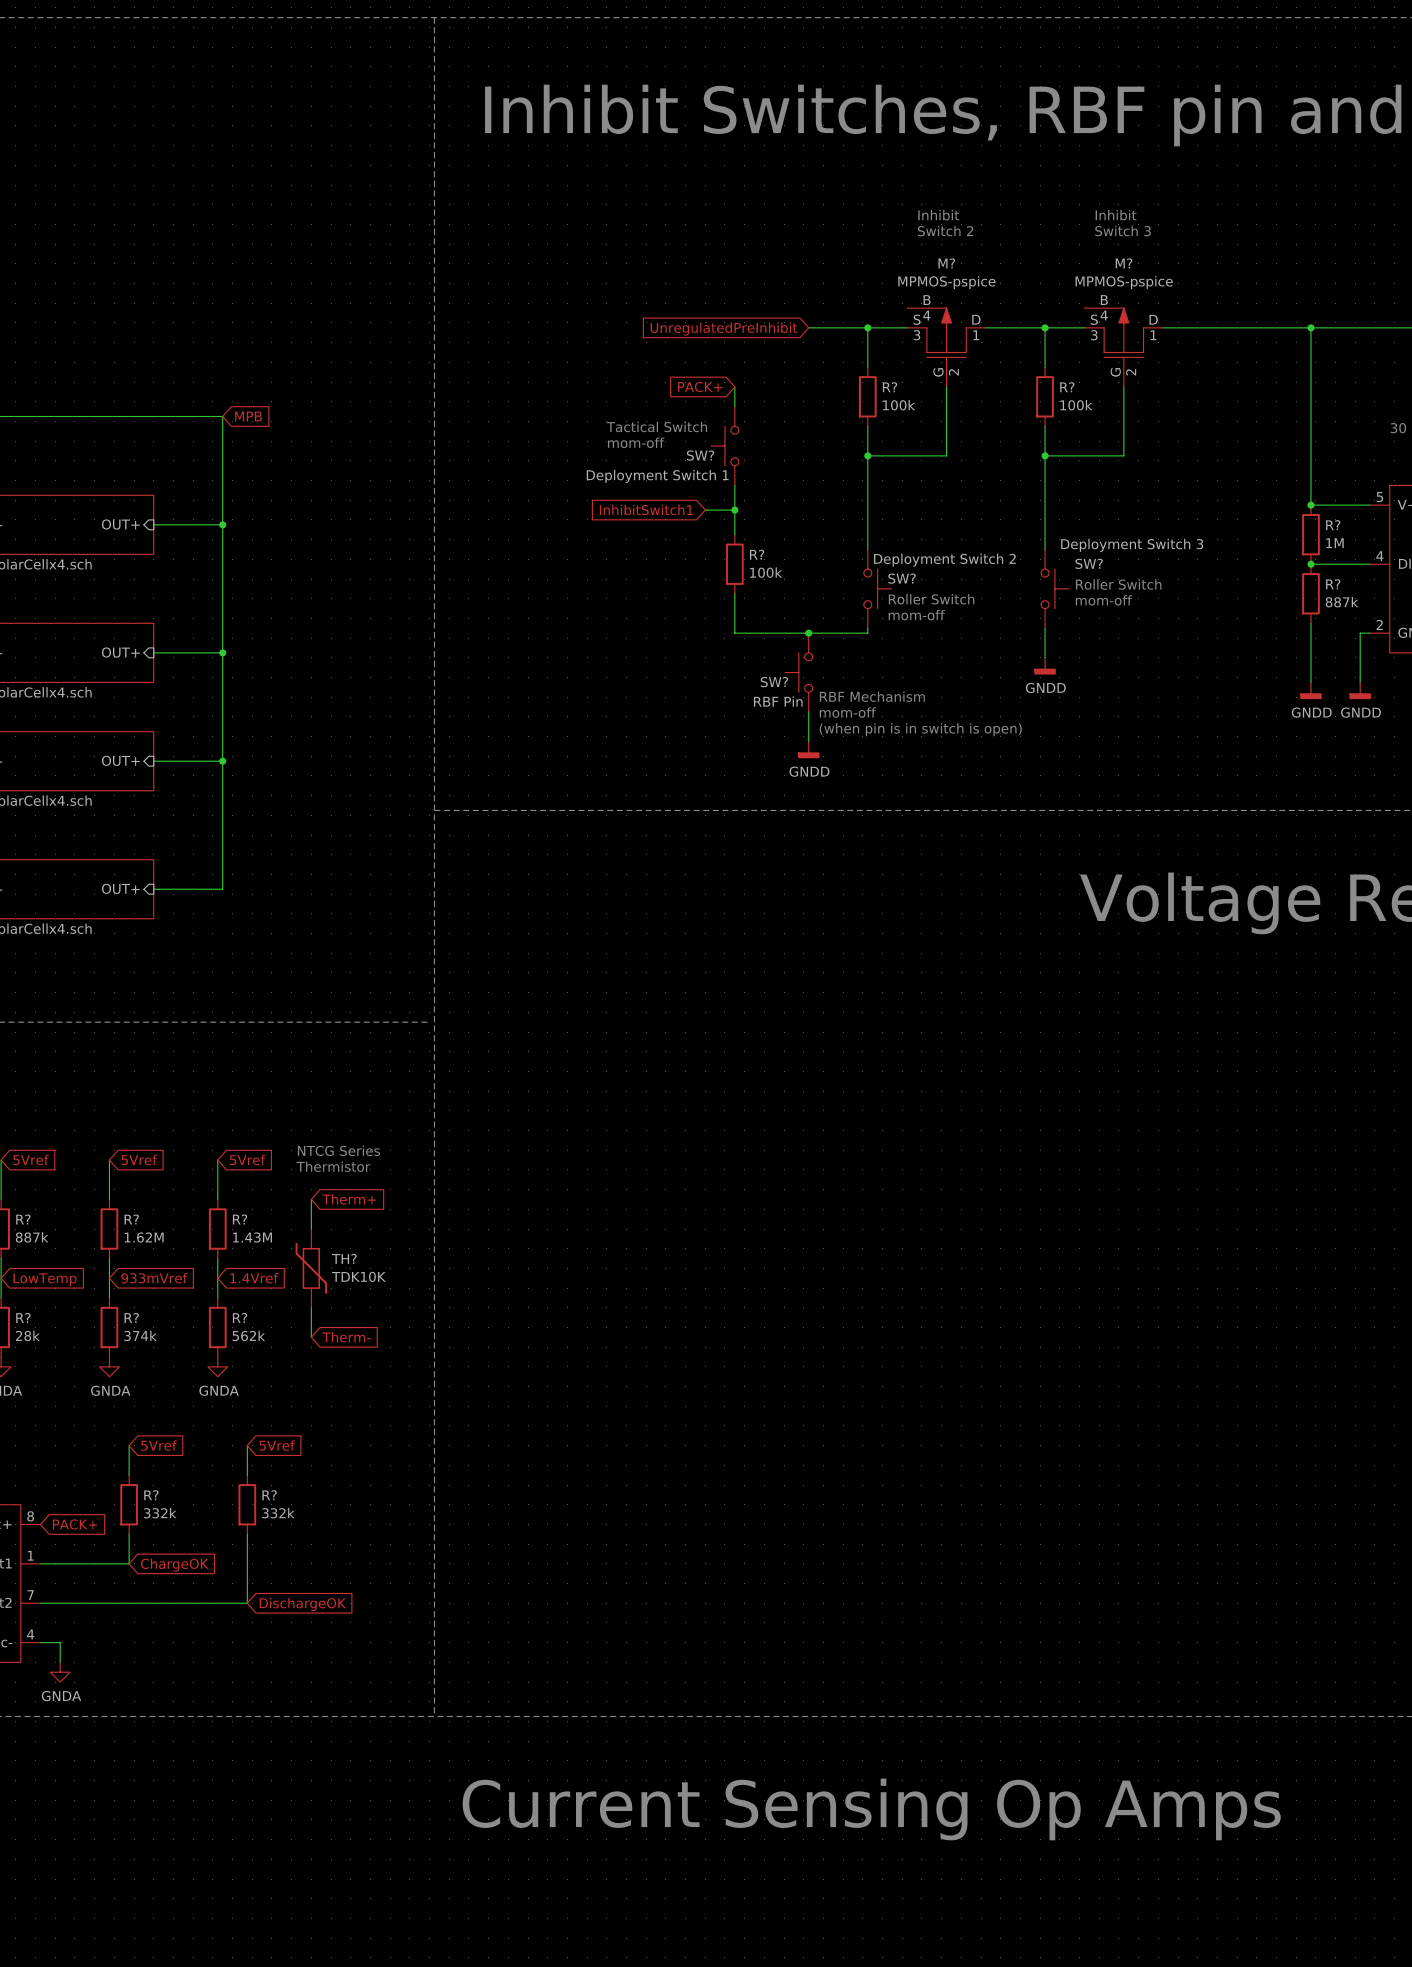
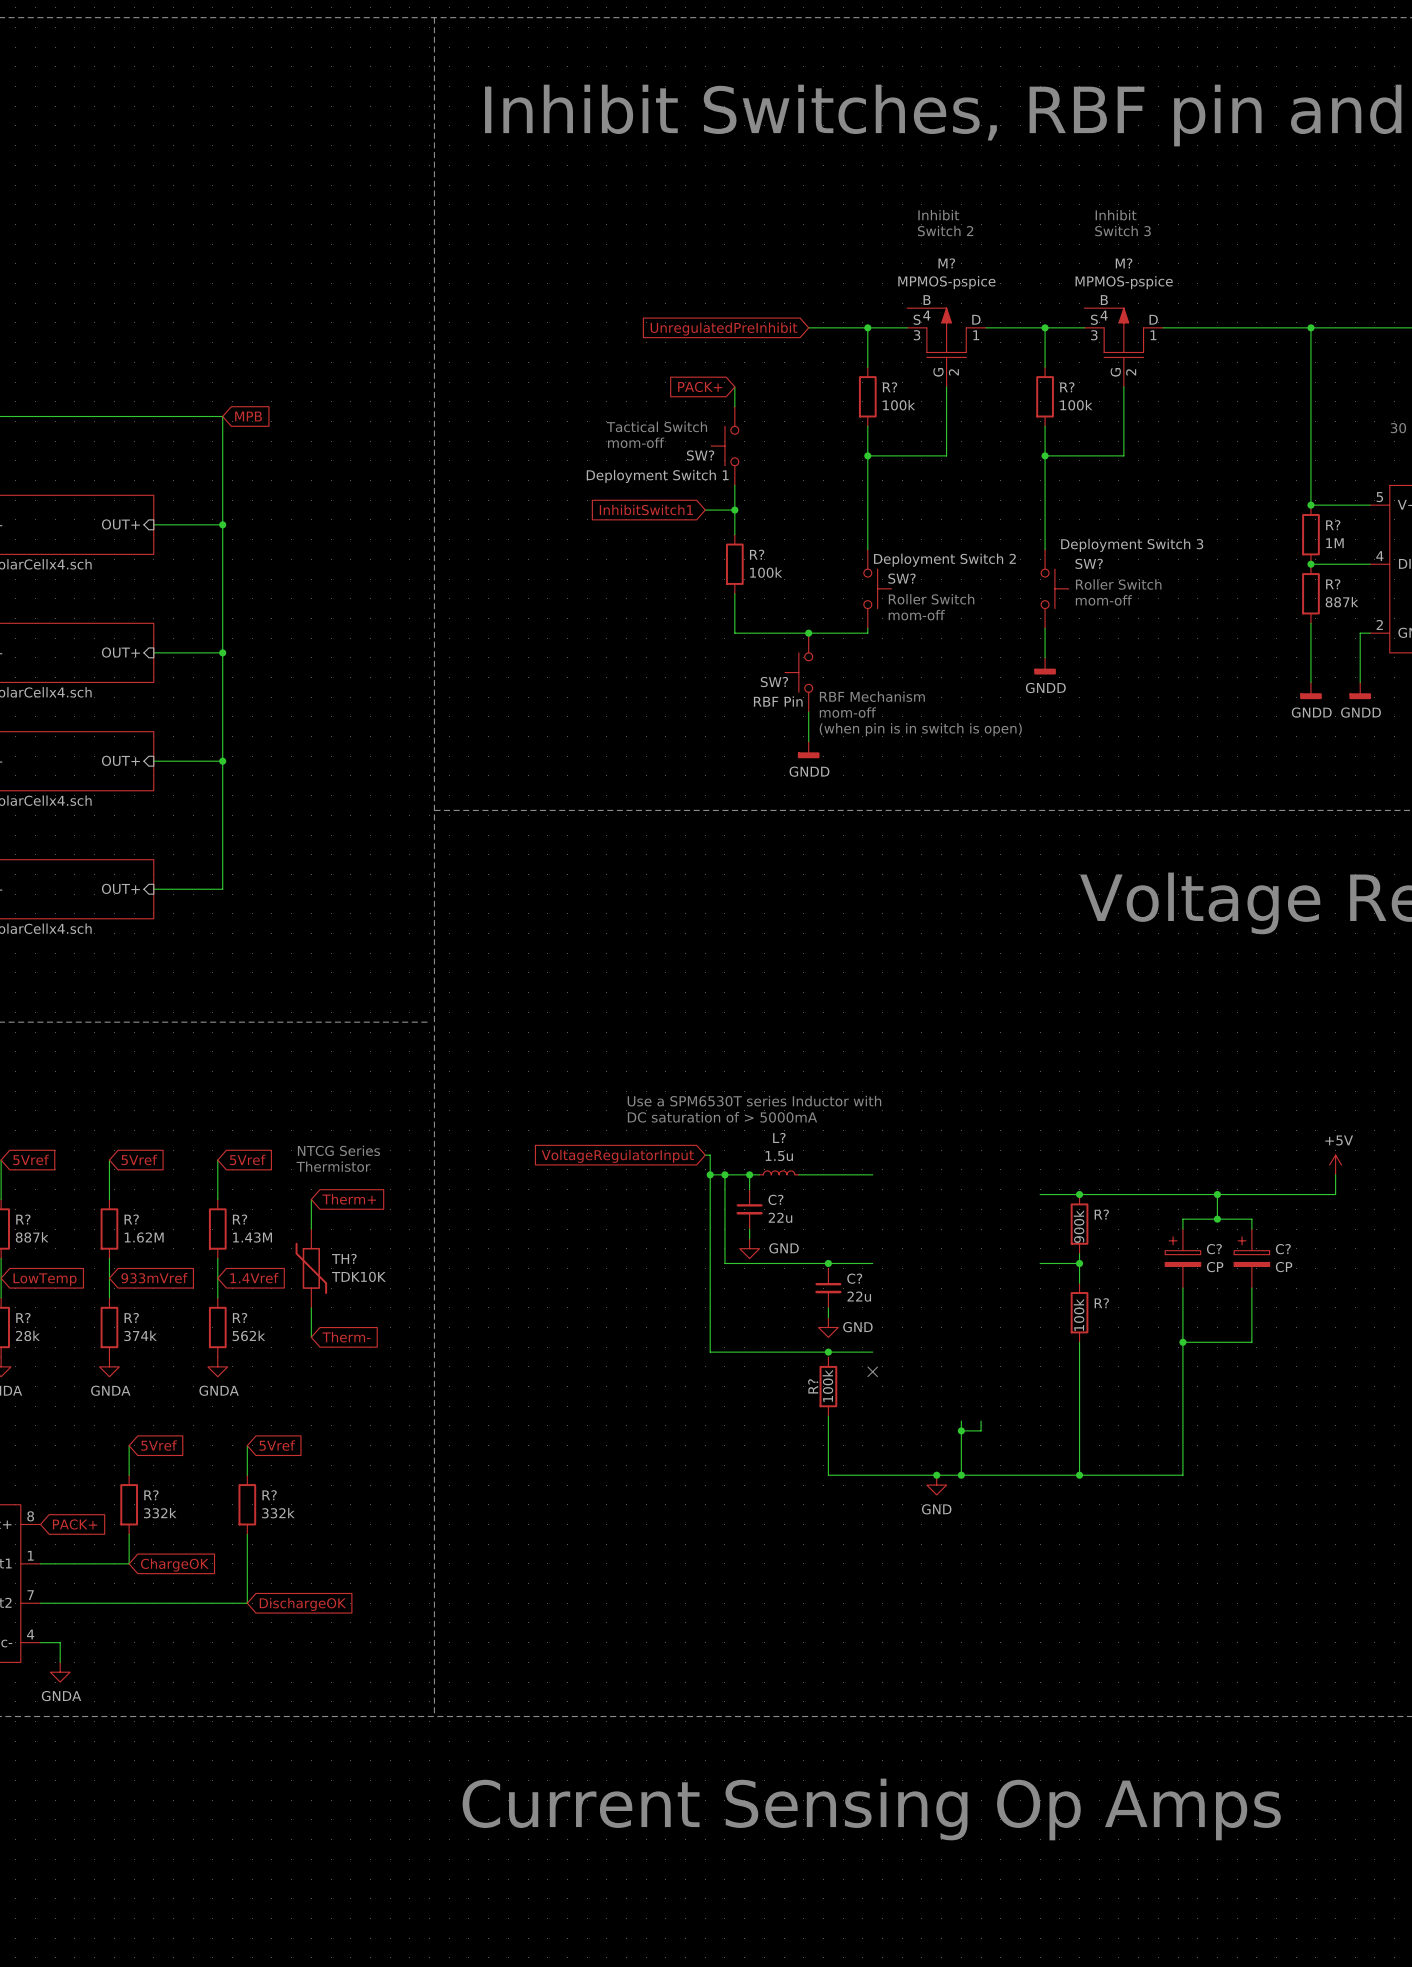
text: none -> Use a SPM6530T series Inductor with (754, 1101)
text: none -> DC saturation of > 5000mA (722, 1117)
wire: none -> (705, 1155) (710, 1155) (710, 1352) (872, 1352)
global label: none -> VoltageRegulatorInput (617, 1156)
power symbol: none -> +5V (1335, 1164)
L?: none -> 1.5u (779, 1172)
wire: none -> (710, 1174) (759, 1174)
junction: none -> (710, 1174)
wire: none -> (724, 1174) (724, 1263) (872, 1263)
junction: none -> (724, 1174)
wire: none -> (749, 1174) (749, 1189)
junction: none -> (749, 1174)
wire: none -> (798, 1174) (872, 1174)
wire: none -> (1335, 1174) (1335, 1194) (1040, 1194)
junction: none -> (1079, 1194)
wire: none -> (1217, 1194) (1217, 1219)
junction: none -> (1217, 1194)
C?: none -> 22u (749, 1209)
junction: none -> (1217, 1219)
R?: none -> 900k (1079, 1224)
wire: none -> (749, 1229) (749, 1238)
wire: none -> (1182, 1229) (1182, 1219) (1251, 1219) (1251, 1229)
power symbol: none -> GND (749, 1248)
wire: none -> (1079, 1253) (1079, 1283)
C?: none -> CP (1182, 1258)
C?: none -> CP (1251, 1258)
junction: none -> (828, 1263)
wire: none -> (1040, 1263) (1079, 1263)
junction: none -> (1079, 1263)
C?: none -> 22u (828, 1288)
wire: none -> (1182, 1288) (1182, 1475) (828, 1475) (828, 1416)
wire: none -> (1251, 1288) (1251, 1342) (1182, 1342)
wire: none -> (828, 1307) (828, 1317)
R?: none -> 100k (1079, 1312)
power symbol: none -> GND (828, 1327)
wire: none -> (1079, 1342) (1079, 1475)
junction: none -> (1182, 1342)
junction: none -> (828, 1352)
no-connect mark: none -> (872, 1371)
R?: none -> 100k (828, 1386)
wire: none -> (961, 1421) (961, 1475)
wire: none -> (981, 1421) (981, 1430) (961, 1430)
junction: none -> (961, 1430)
junction: none -> (936, 1475)
junction: none -> (961, 1475)
junction: none -> (1079, 1475)
power symbol: none -> GND (936, 1485)

